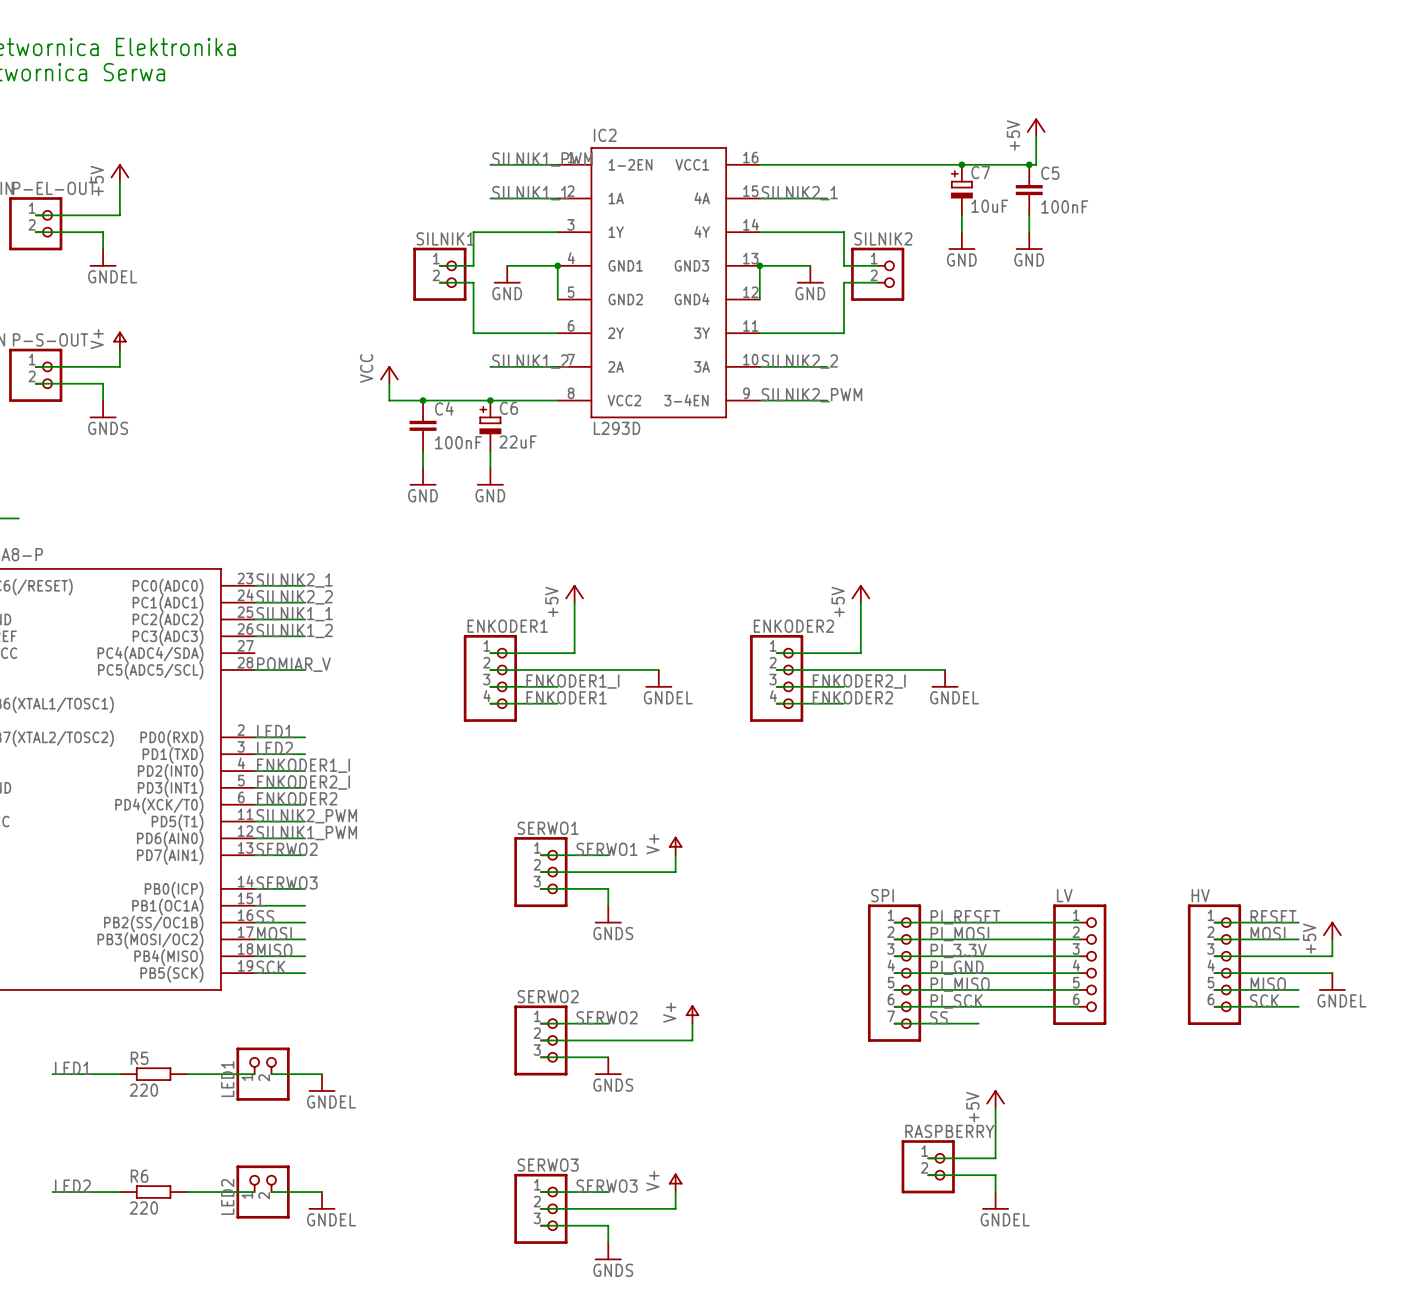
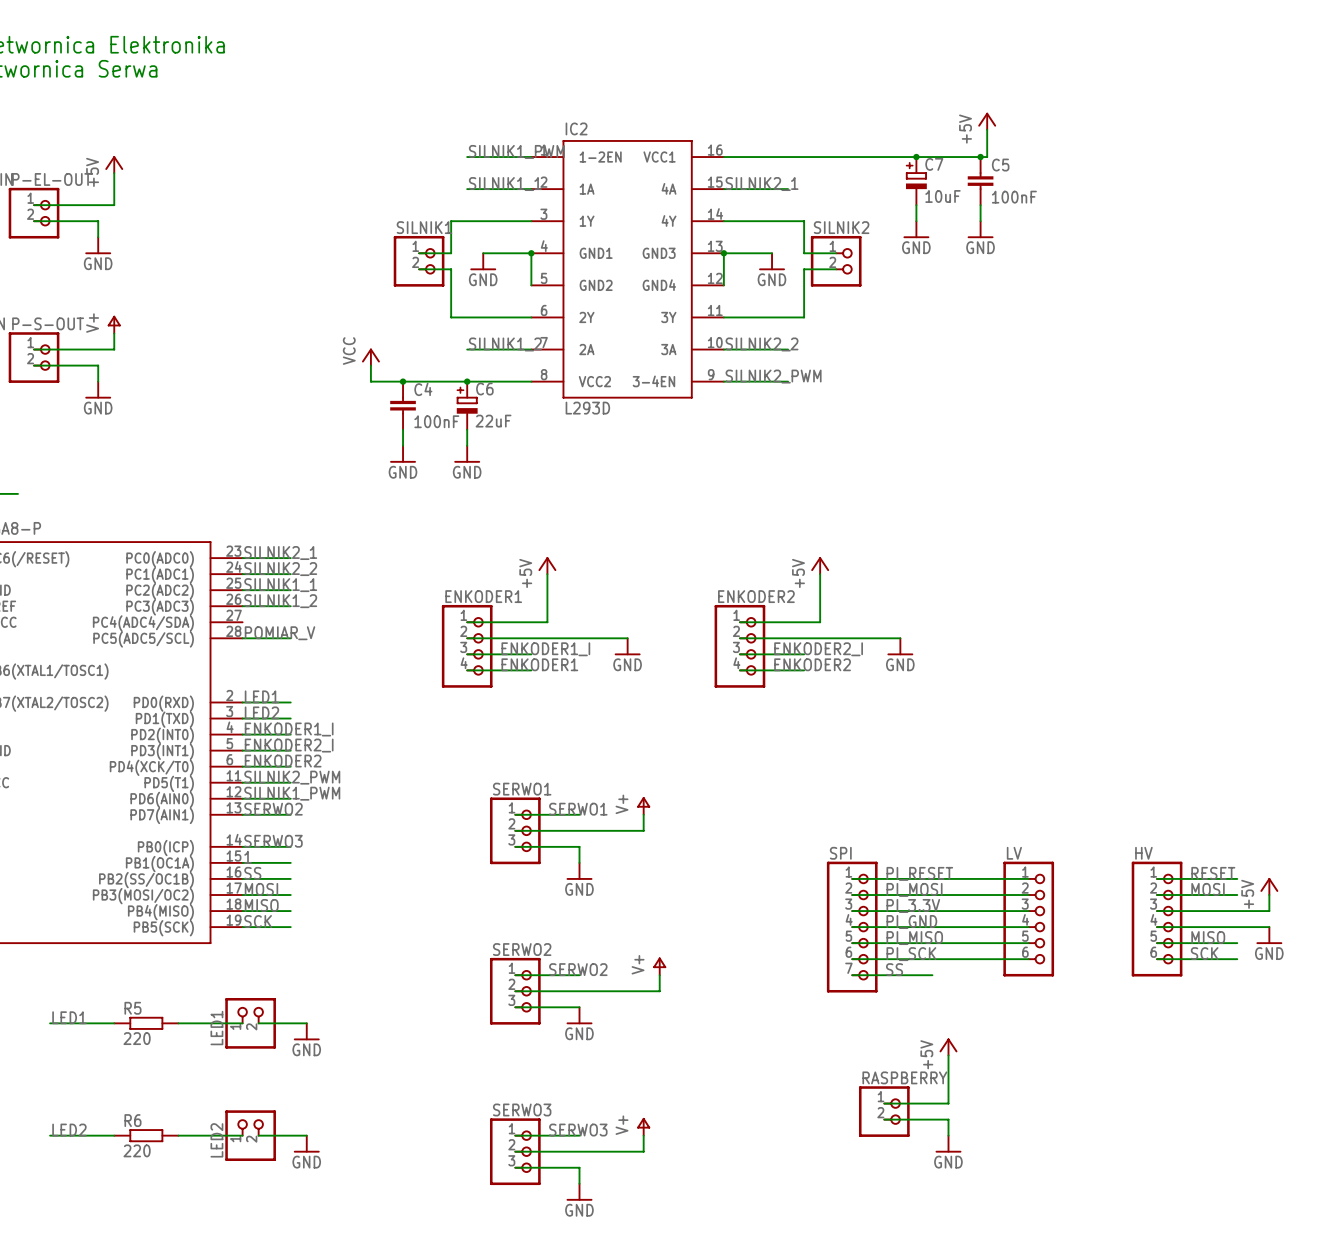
power symbol: GNDEL (103, 257) -> GND (98, 245)
power symbol: GNDS (103, 409) -> GND (98, 390)
power symbol: GNDEL (658, 678) -> GND (627, 646)
power symbol: GNDEL (945, 678) -> GND (900, 646)
power symbol: GNDS (608, 914) -> GND (579, 871)
power symbol: GNDEL (1332, 981) -> GND (1269, 935)
power symbol: GNDS (608, 1066) -> GND (579, 1015)
power symbol: GNDEL (321, 1082) -> GND (306, 1031)
power symbol: GNDEL (321, 1200) -> GND (306, 1144)
power symbol: GNDEL (995, 1200) -> GND (948, 1144)
power symbol: GNDS (608, 1251) -> GND (579, 1192)

